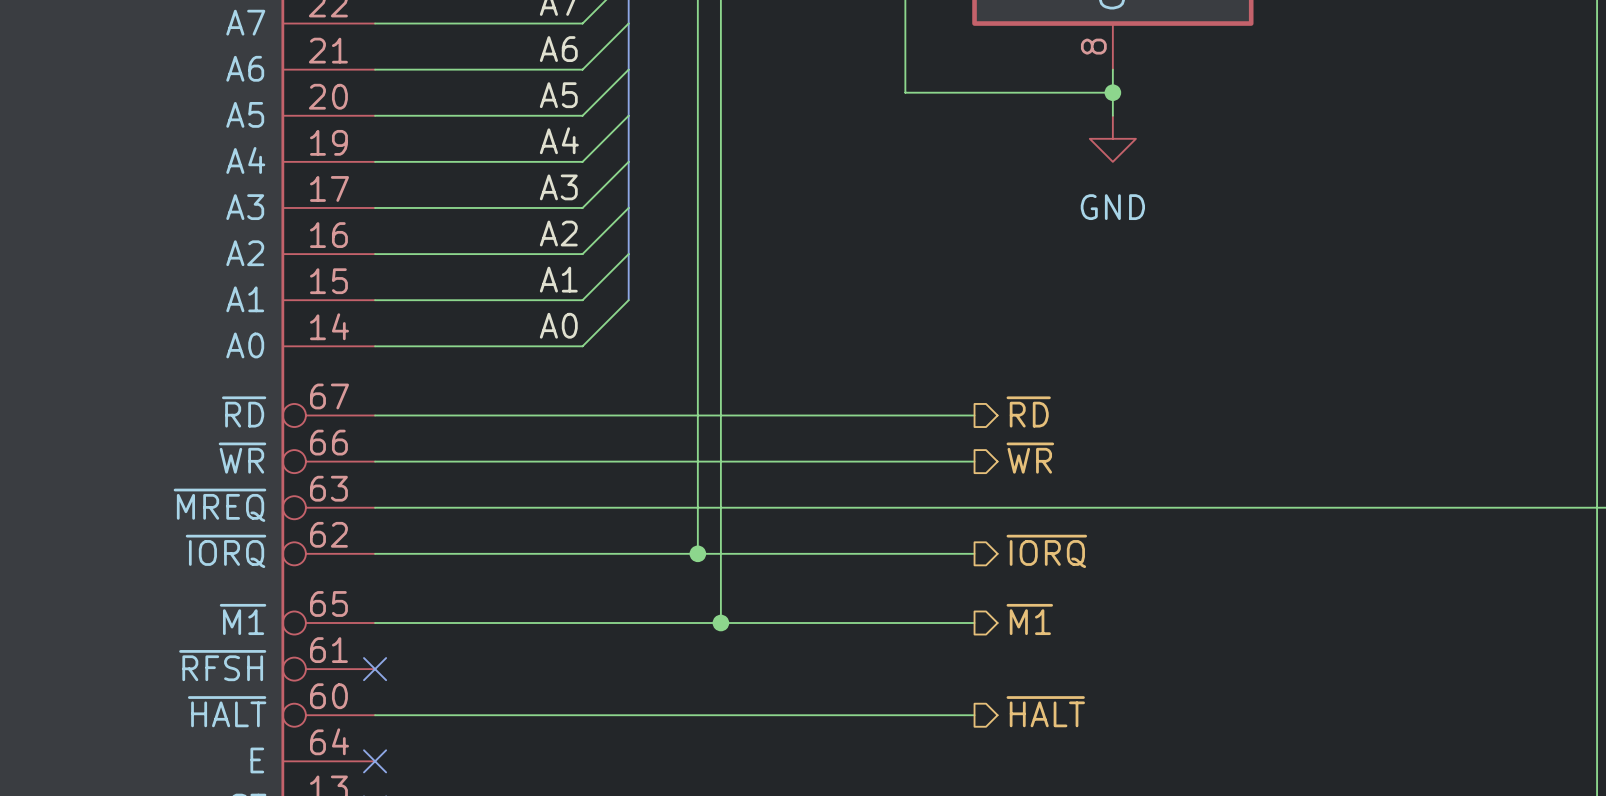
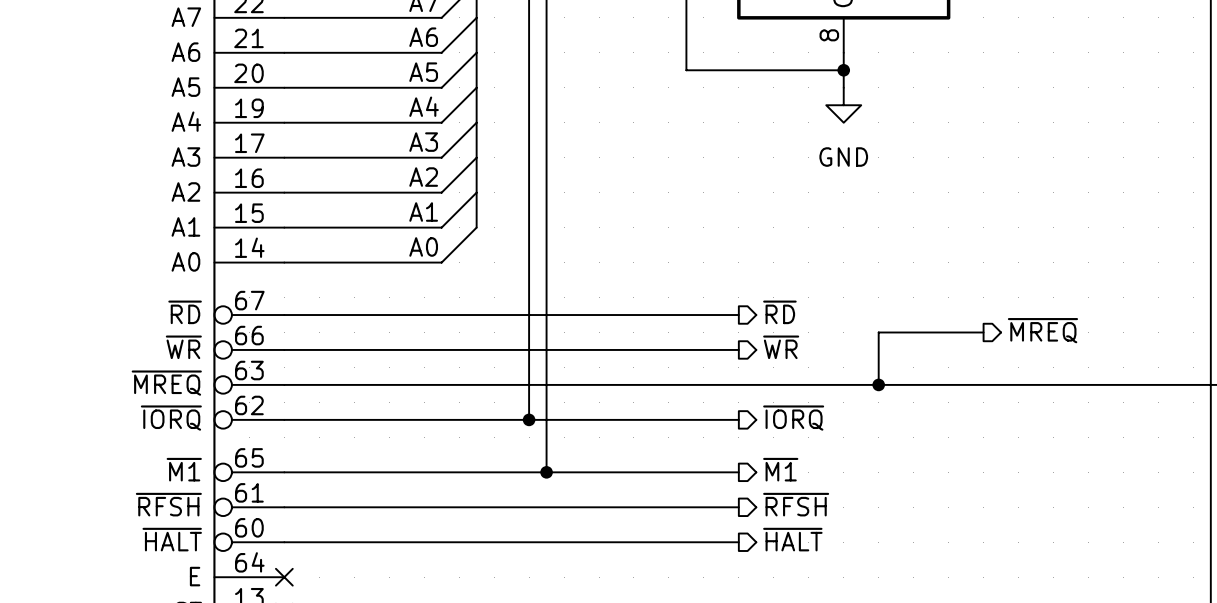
hierarchical label: none -> ~{MREQ} (1042, 330)
wire: none -> (983, 332) (878, 332) (878, 384)
junction: none -> (878, 384)
hierarchical label: none -> ~{RFSH} (796, 504)
wire: none -> (284, 507) (738, 507)
no-connect mark: (375, 669) -> none

